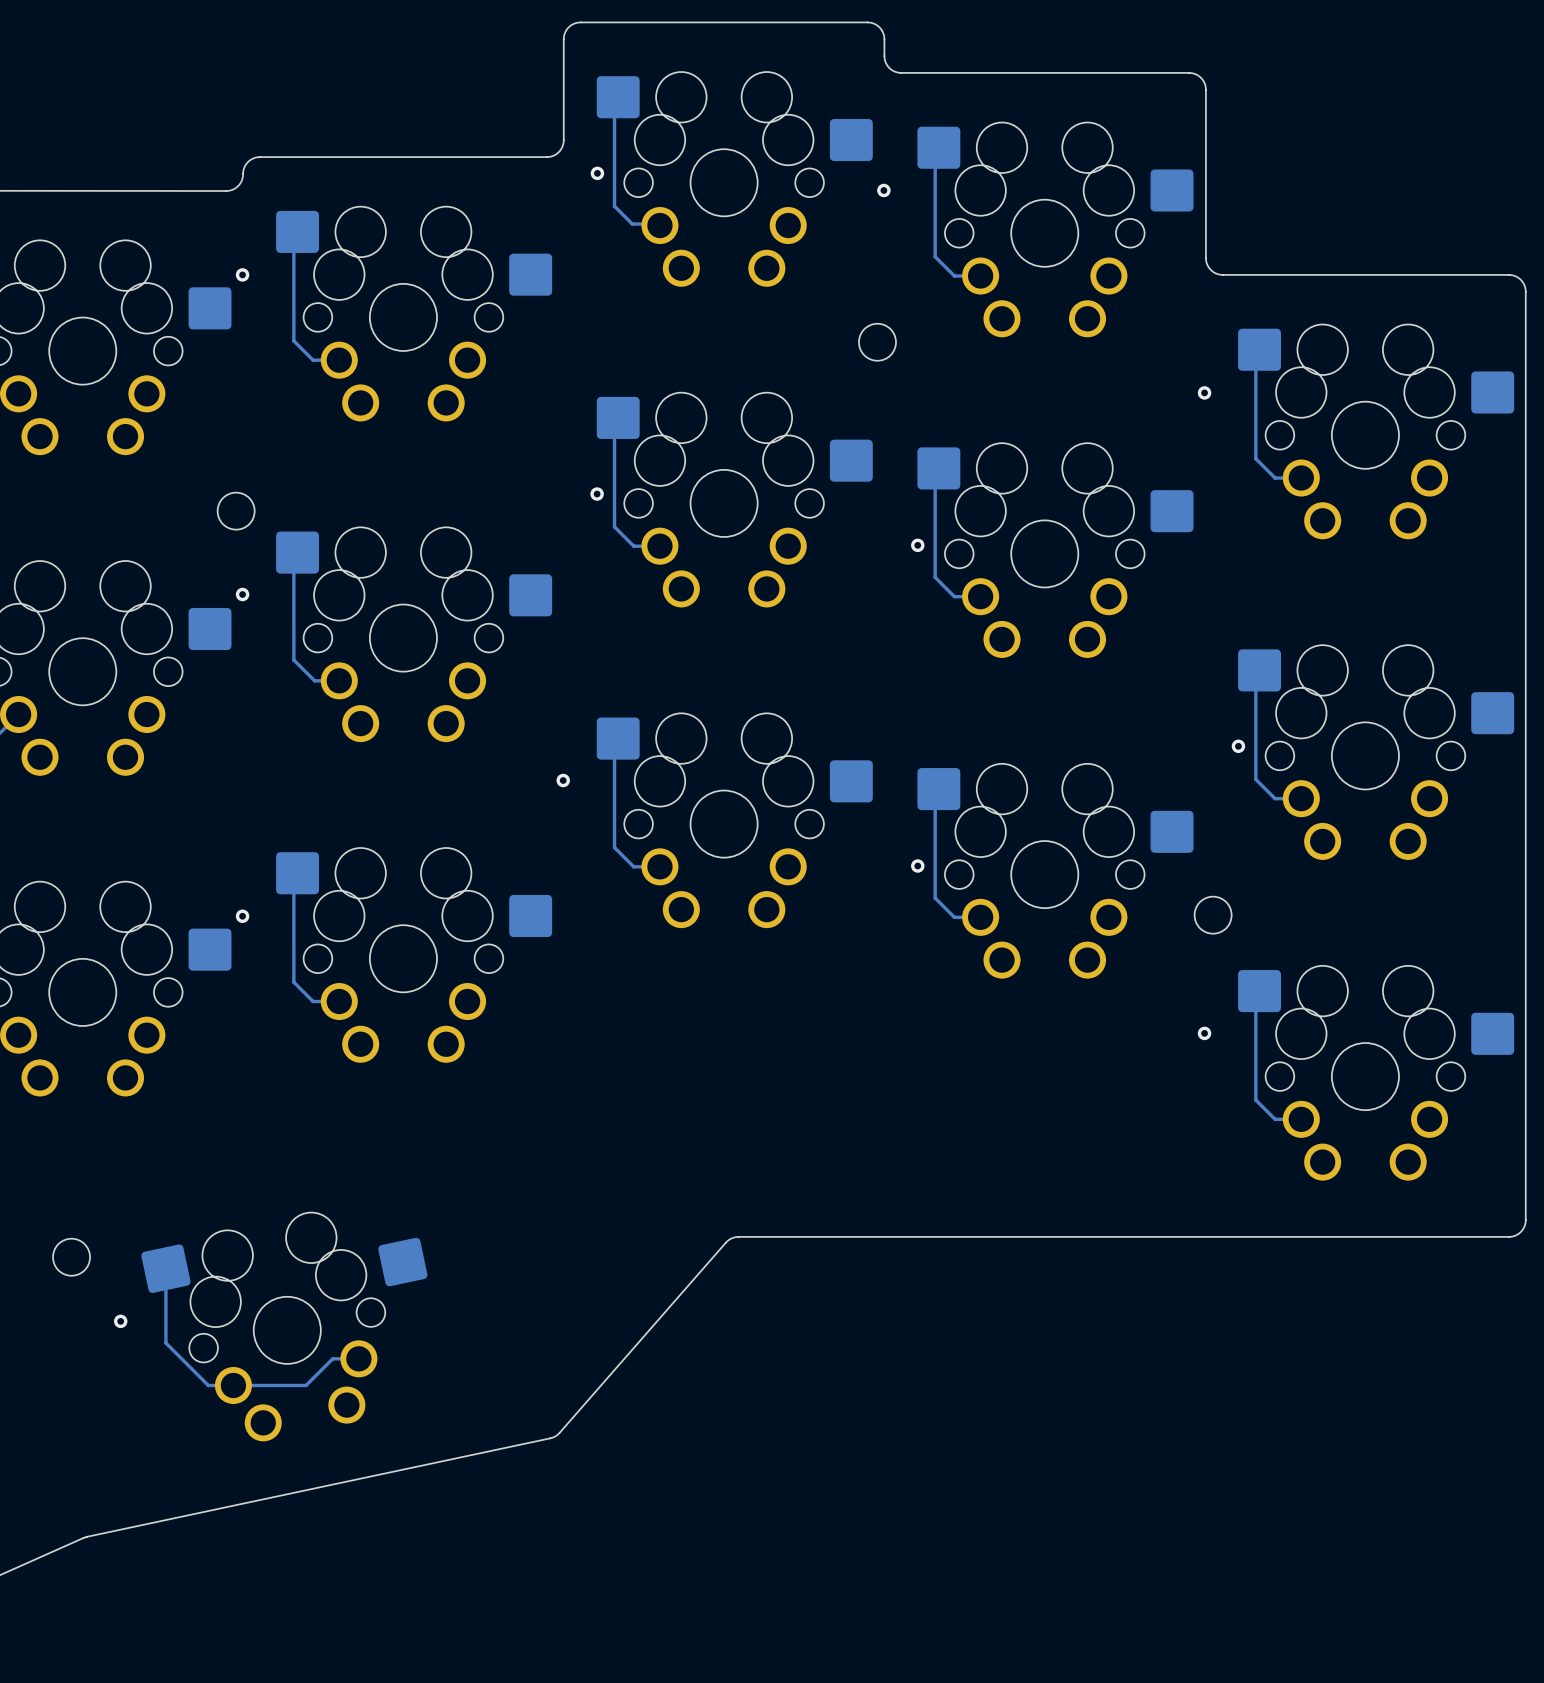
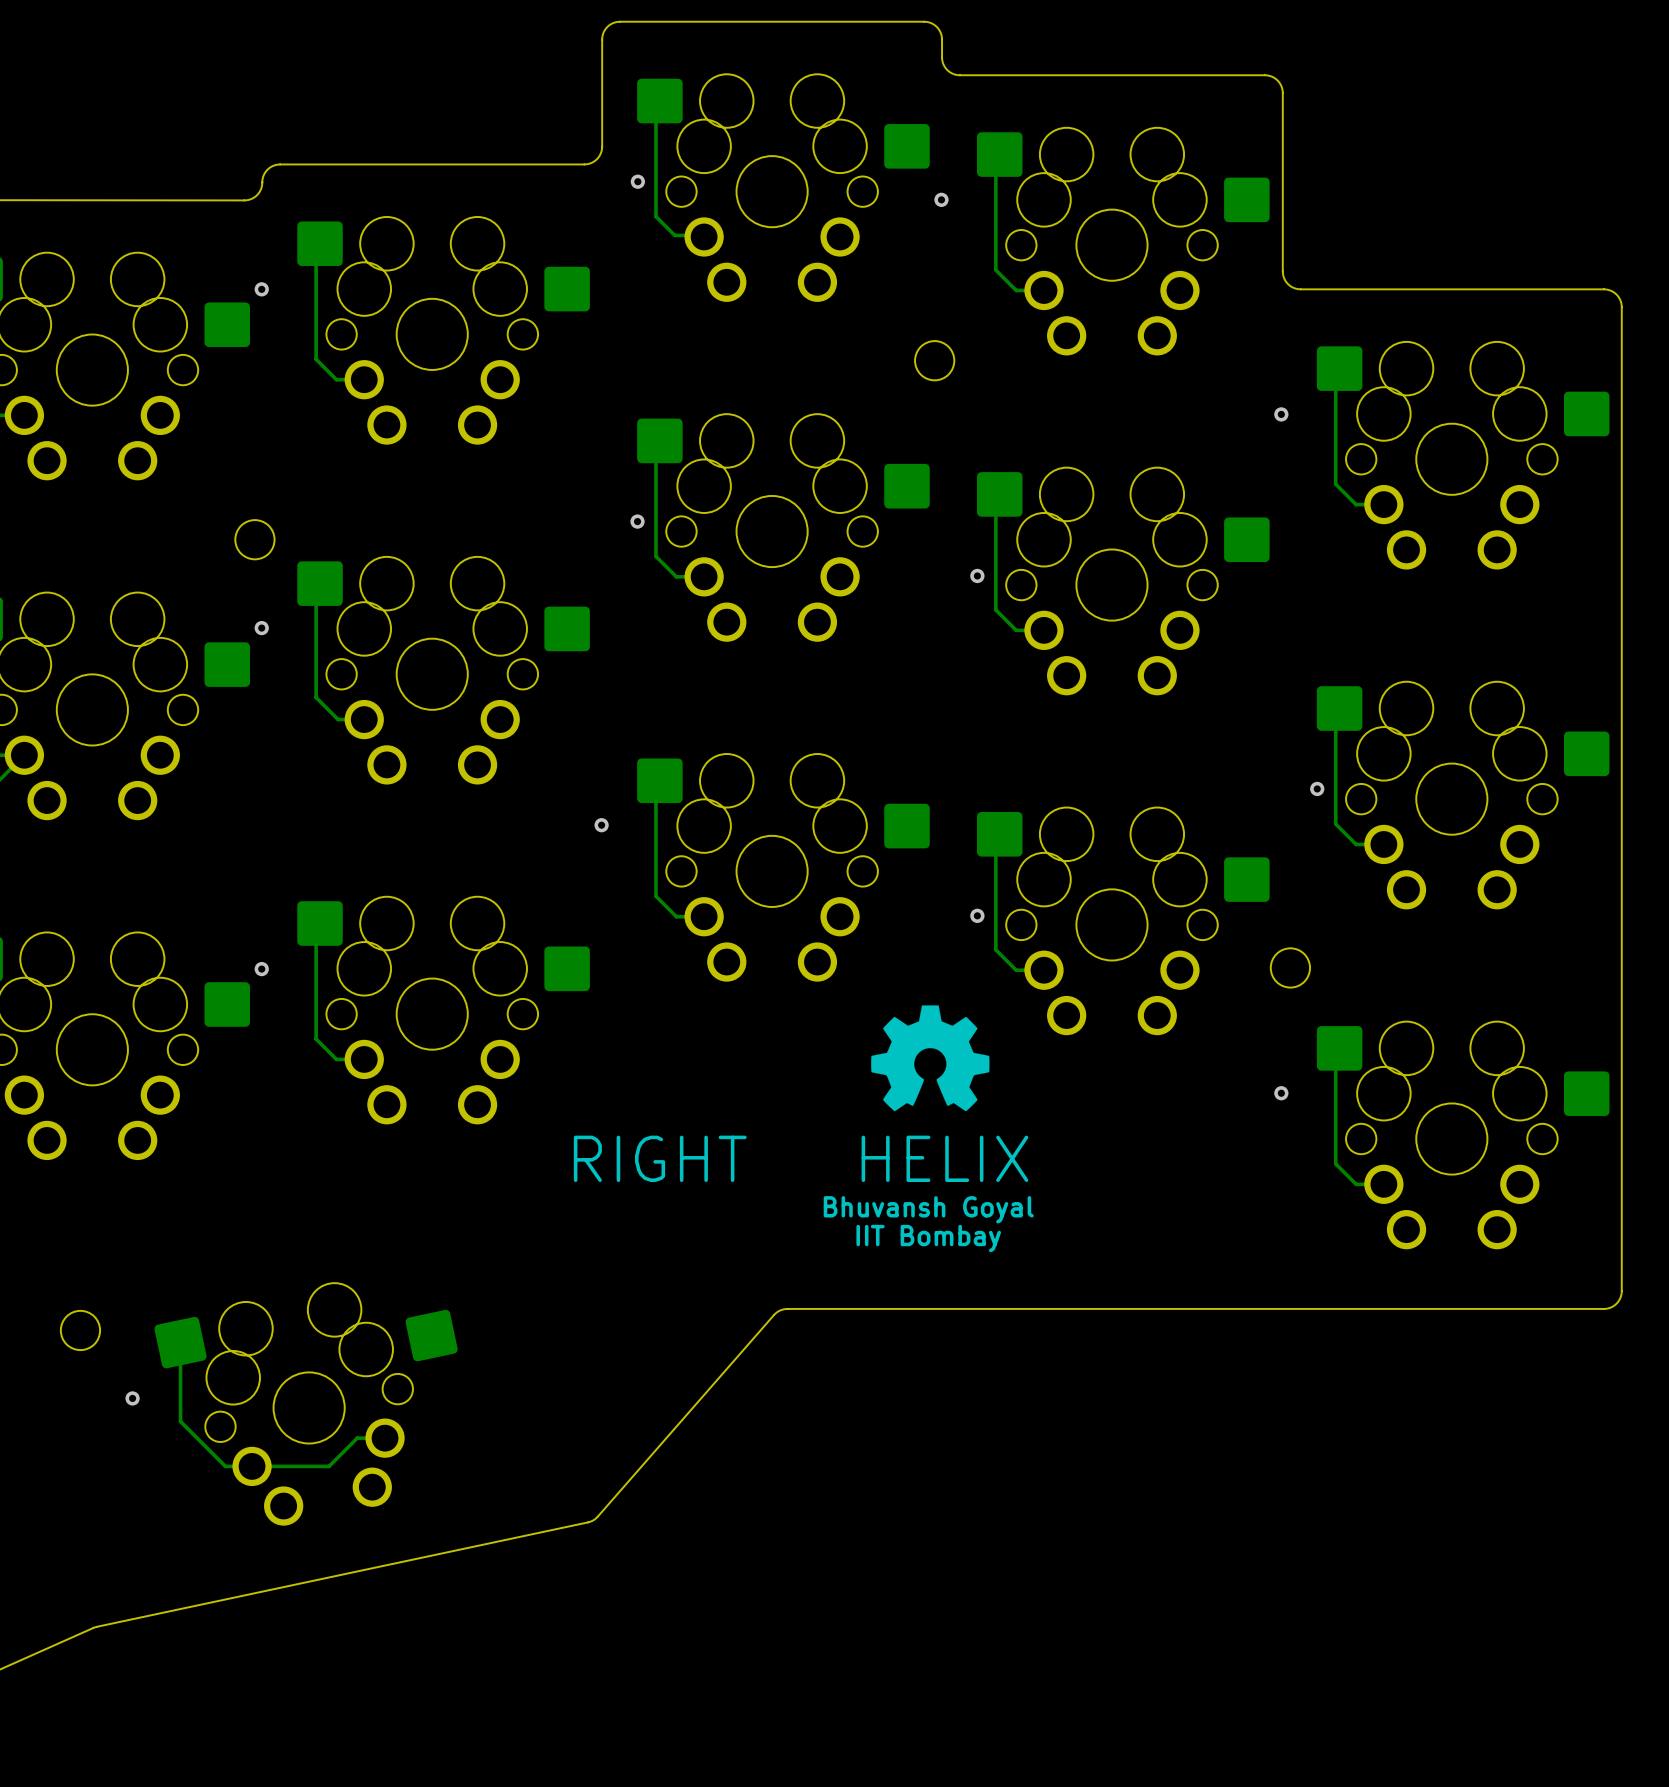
drawing: none -> [871, 1005, 990, 1112]
text: none -> RIGHT (660, 1158)
text: none -> HELIX (944, 1158)
text: none -> Bhuvansh Goyal (928, 1209)
text: none -> IIT Bombay (928, 1238)

